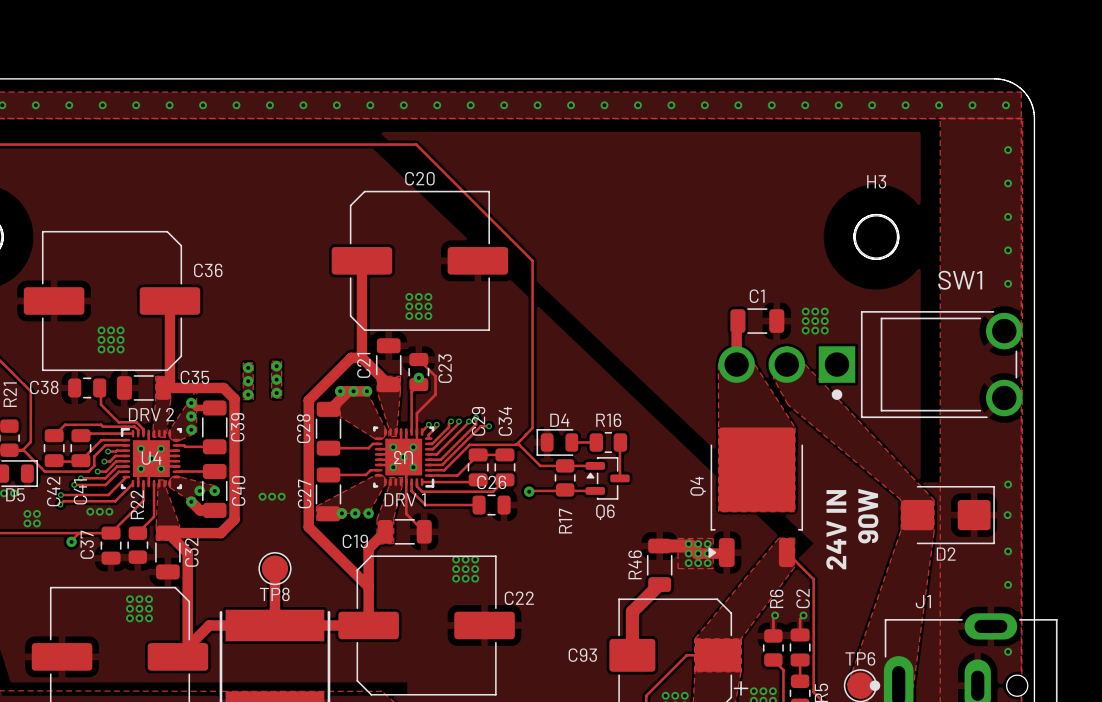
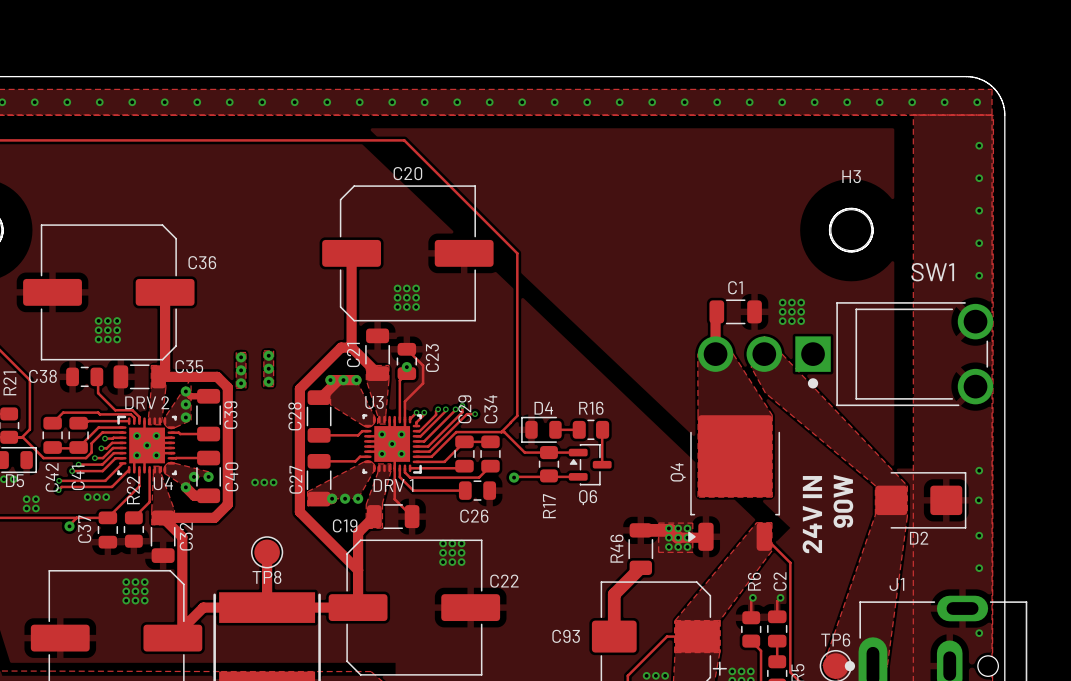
U3 name rotation: 0° (403, 457) -> 180° (374, 402)
U3 name position: U3 (403, 457) -> U3 (374, 402)
U4 name position: U4 (151, 458) -> U4 (163, 483)
C26 name position: C26 (491, 482) -> C26 (474, 516)

